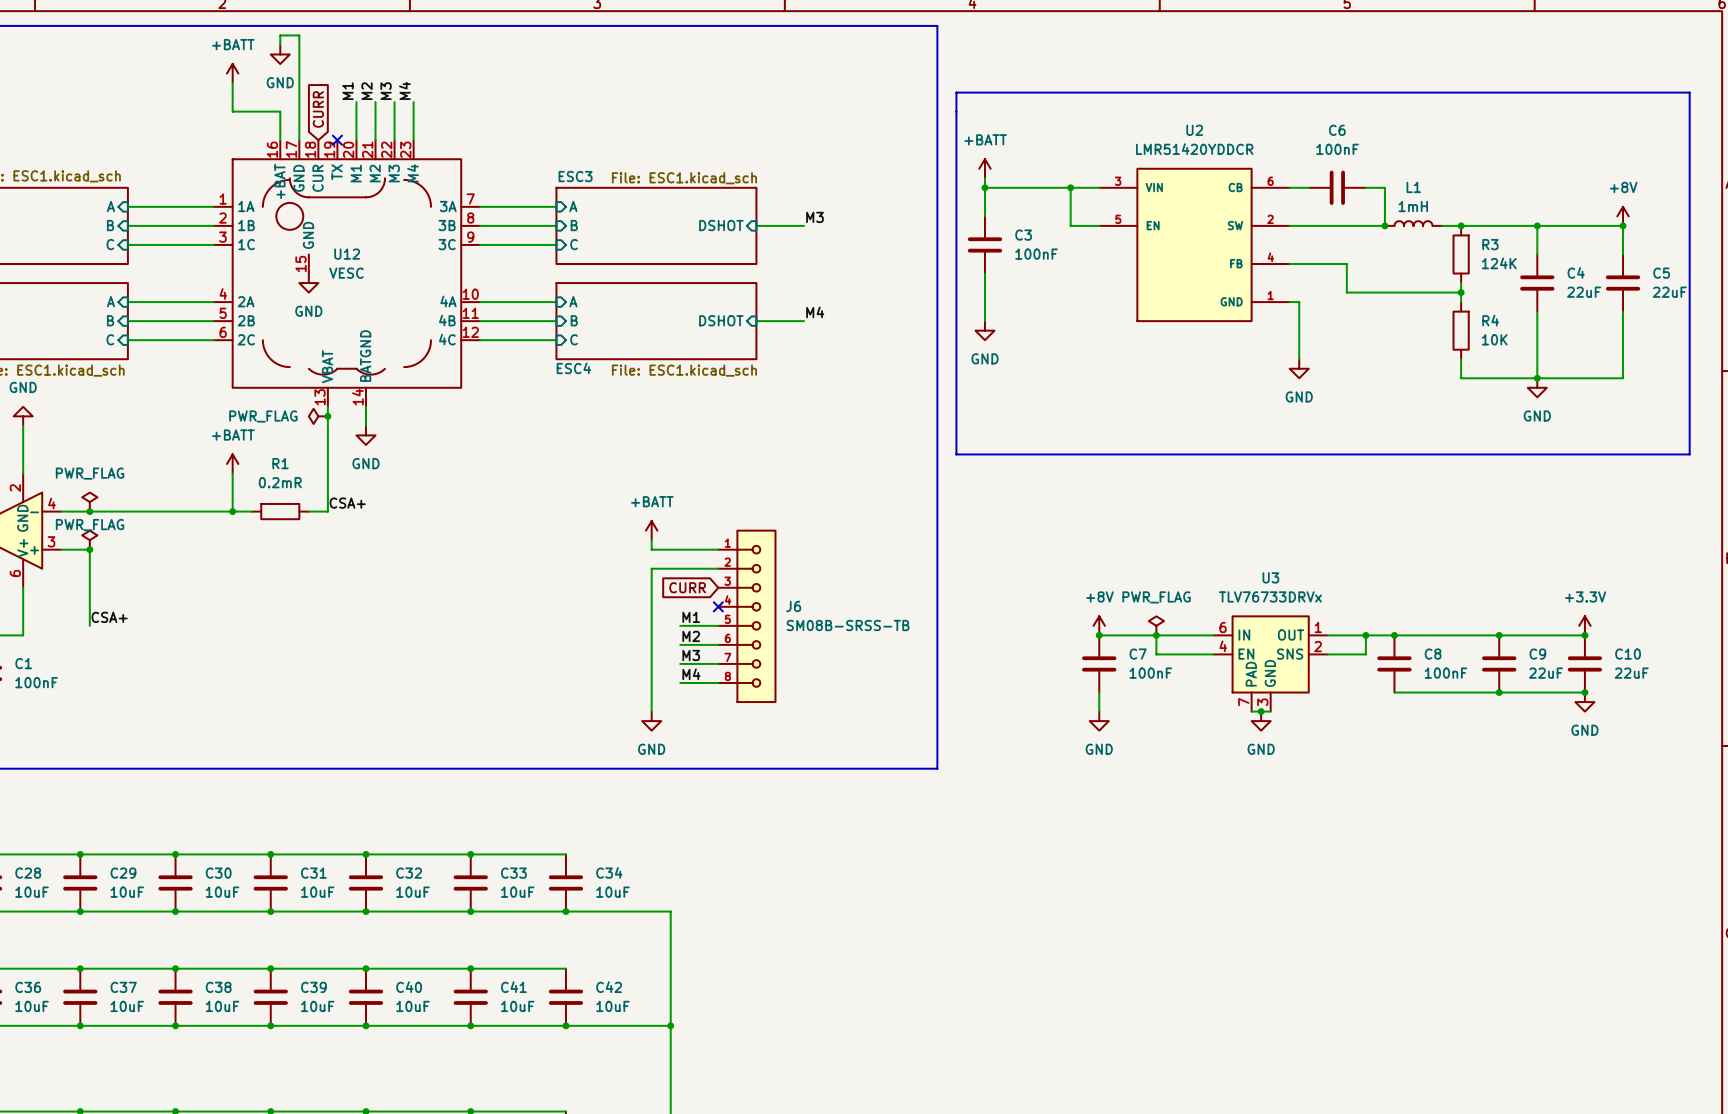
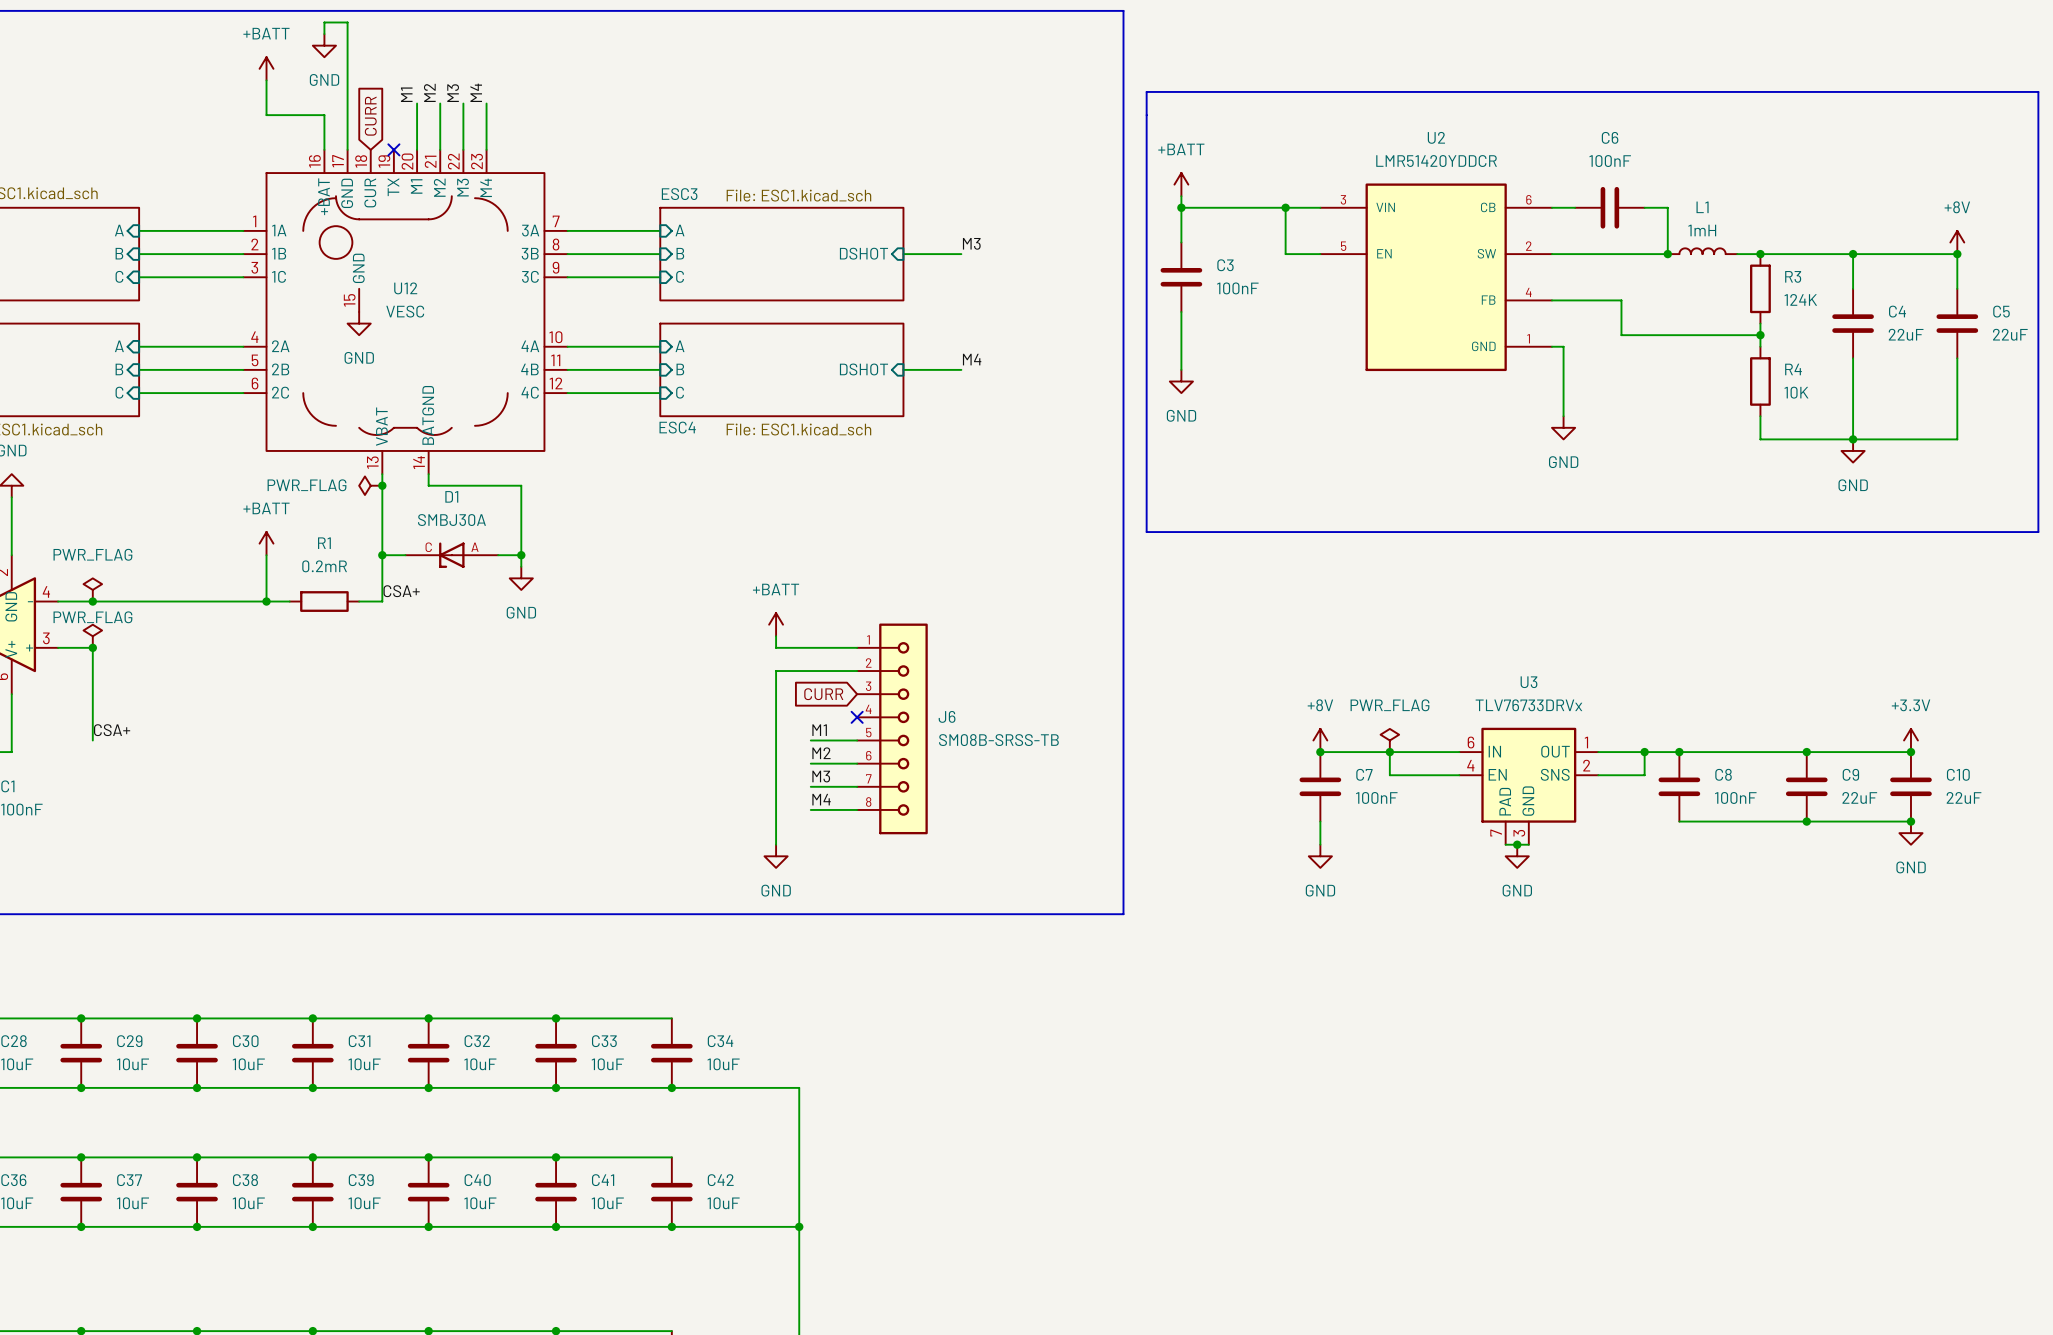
wire: (365, 416) (365, 425) -> (428, 485) (521, 485) (521, 566)
power symbol position: GND (365, 435) -> GND (521, 578)
wire: none -> (382, 555) (405, 555)
junction: none -> (382, 555)
D1: none -> SMBJ30A (451, 555)
wire: none -> (498, 555) (521, 555)
junction: none -> (521, 555)

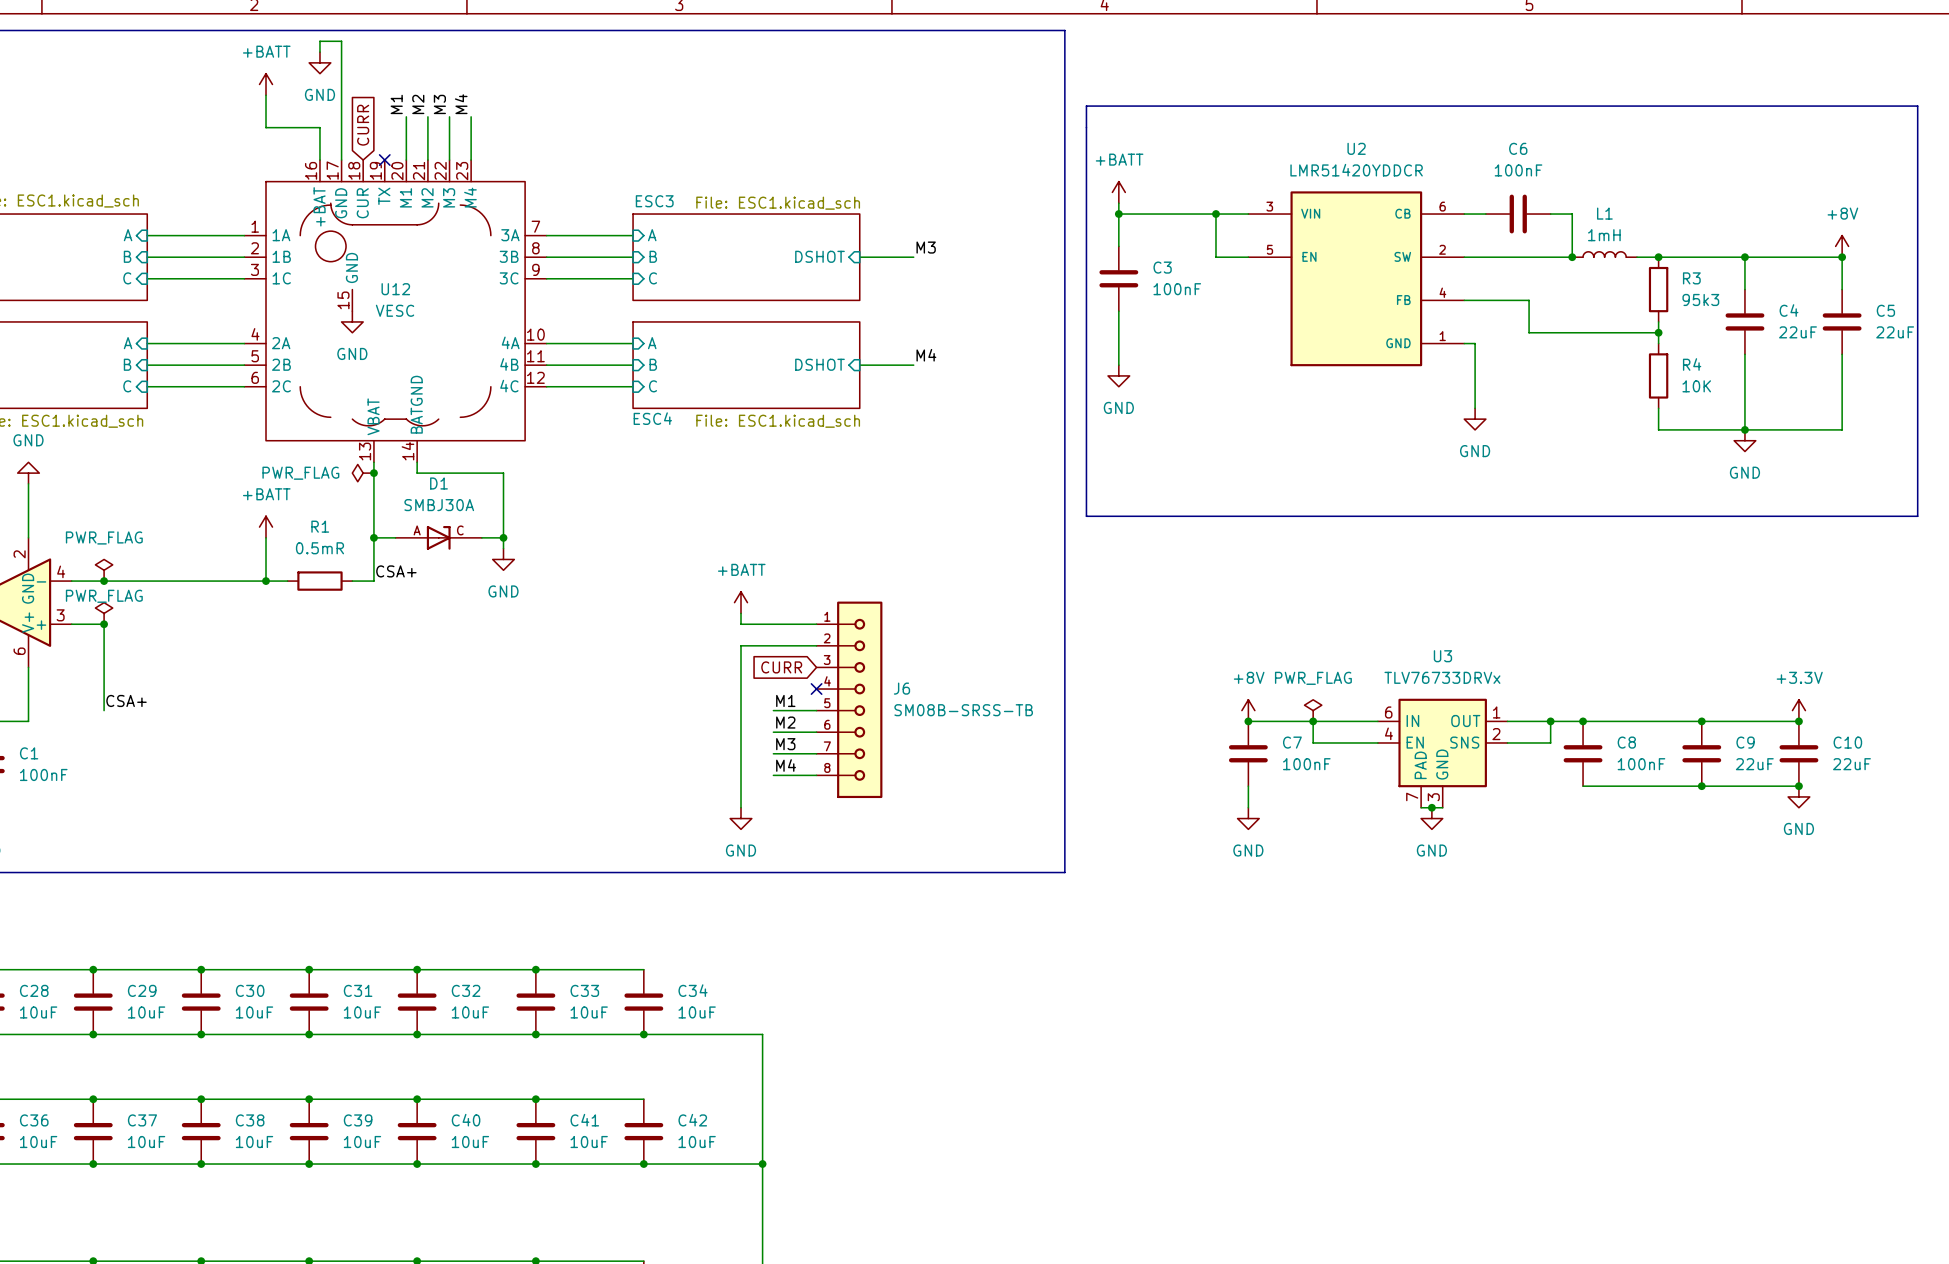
R3 value: 124K (1800, 299) -> 95k3 (1700, 299)
D1 rotation: 0° (451, 555) -> 180° (438, 537)
R1 value: 0.2mR (324, 566) -> 0.5mR (319, 548)

